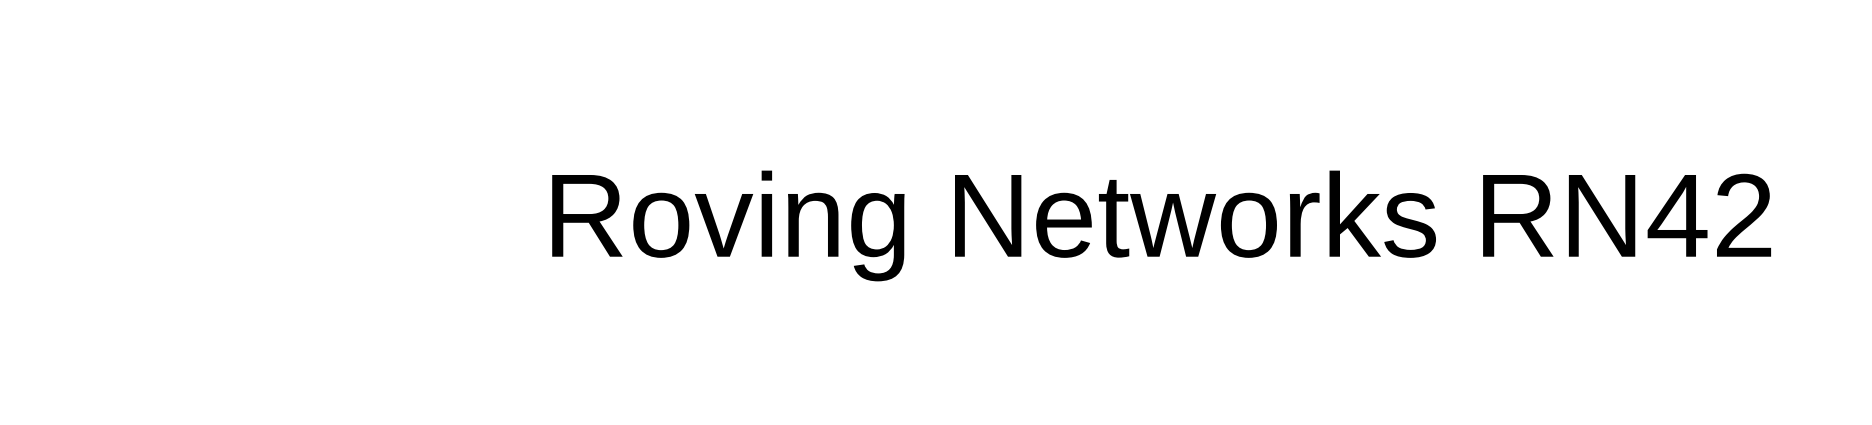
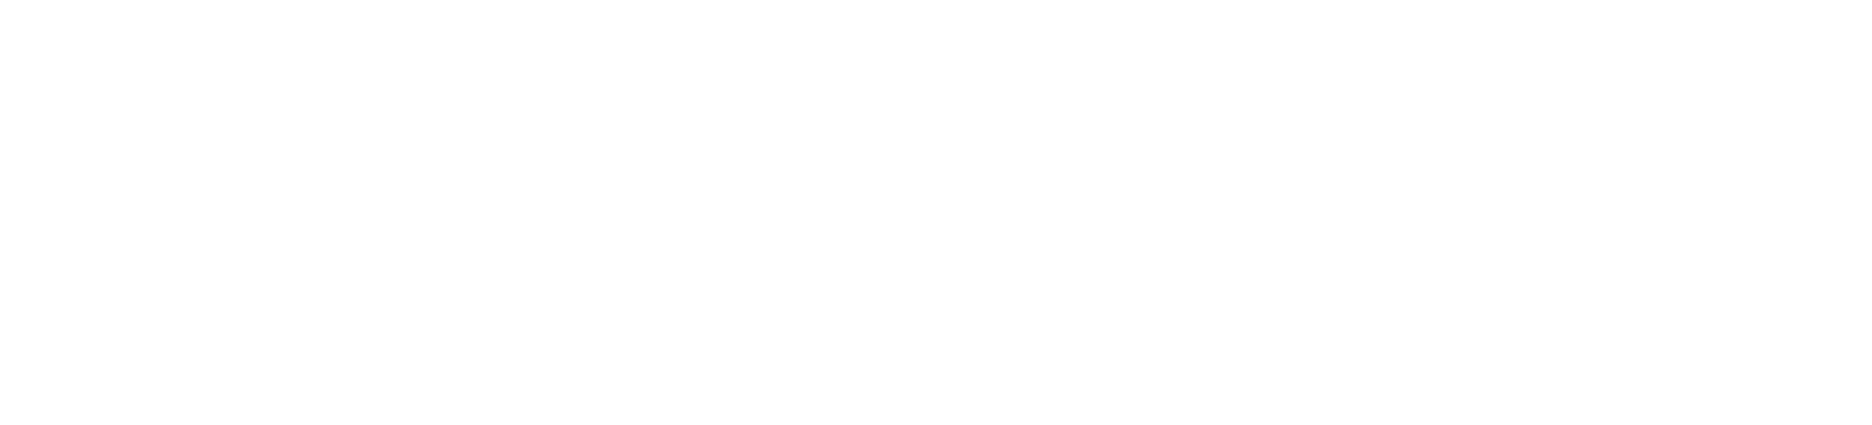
text: Roving Networks RN42 (1161, 226) -> none

